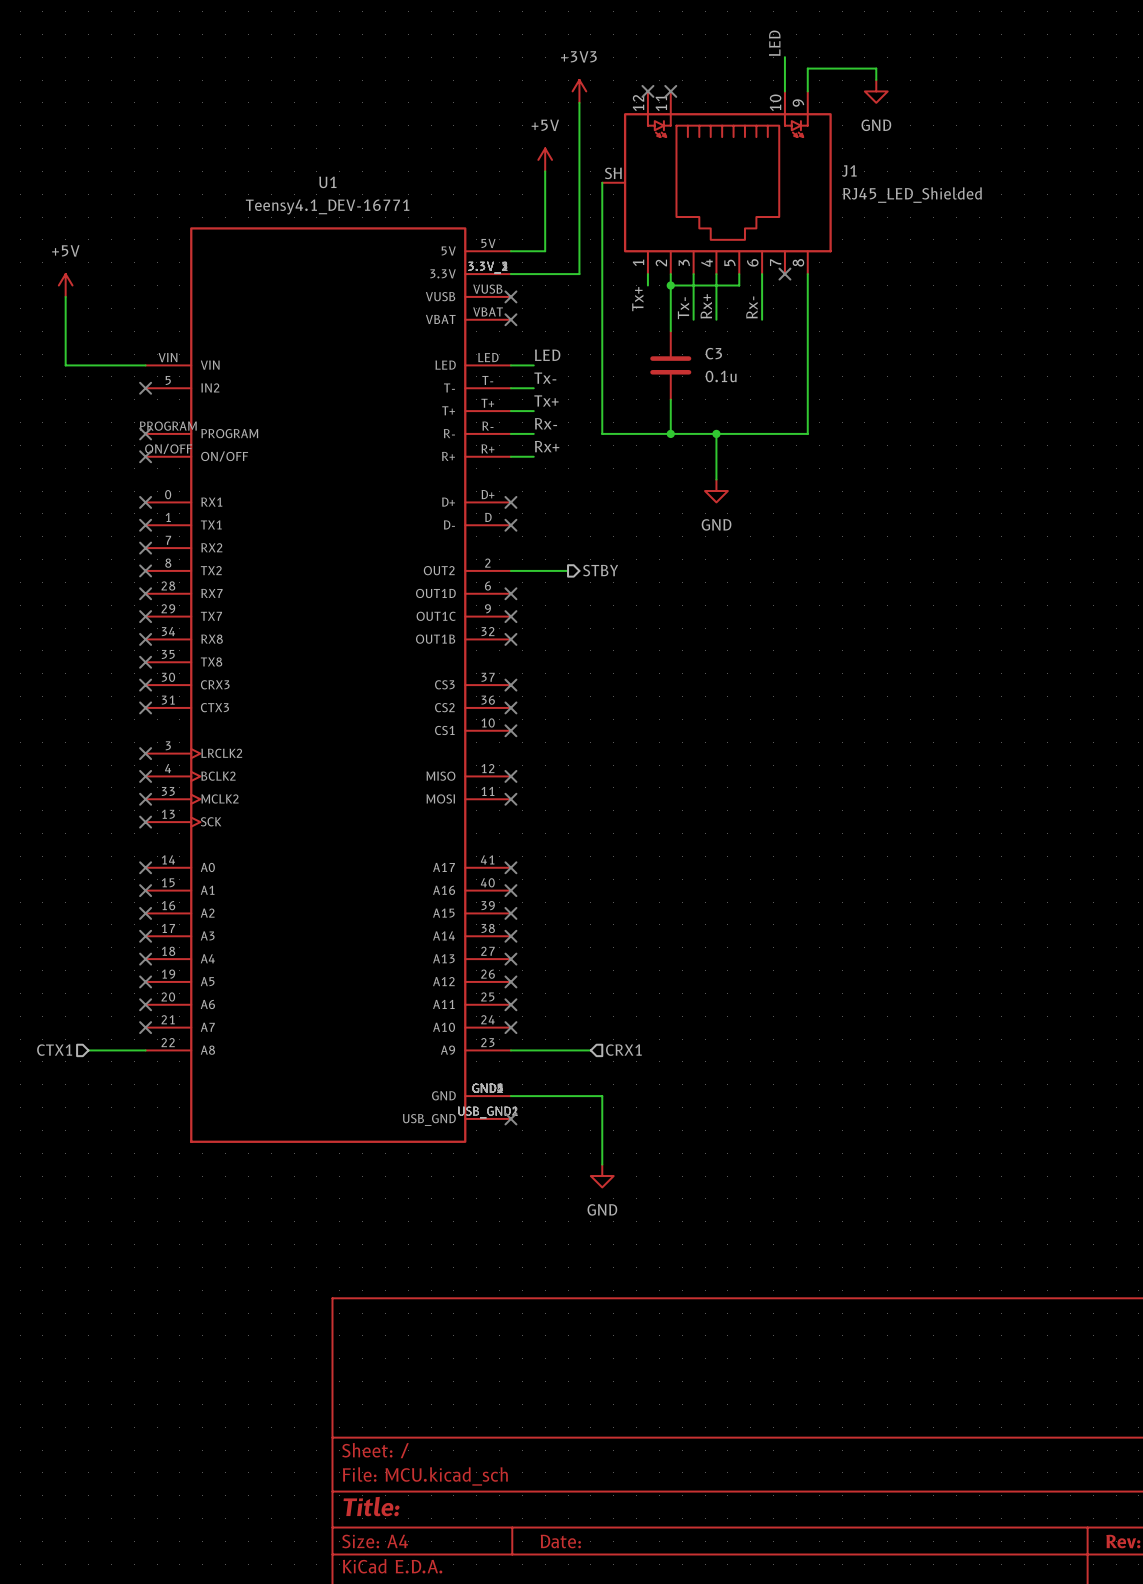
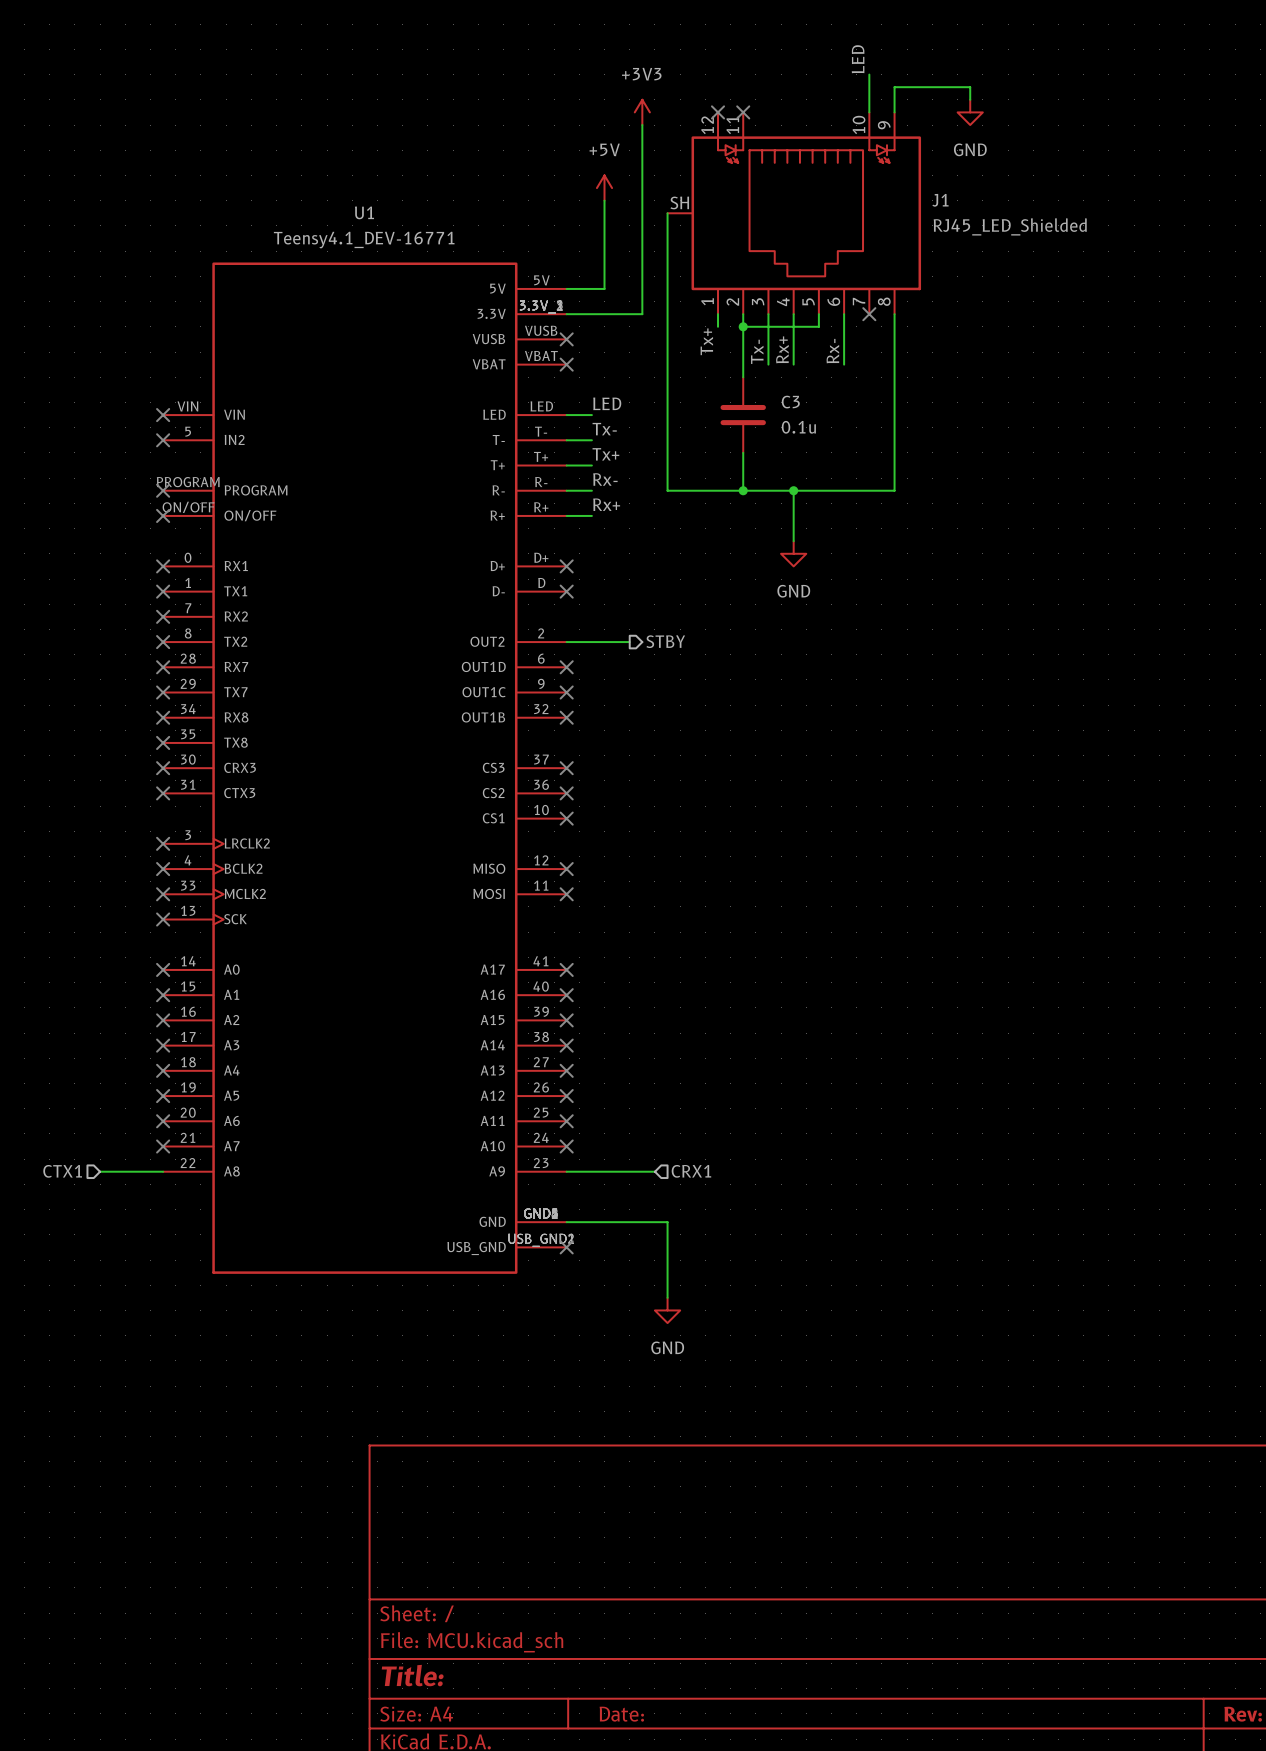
power symbol: +5V (65, 285) -> none
wire: (65, 296) (65, 365) (145, 365) -> none
no-connect mark: none -> (163, 415)

